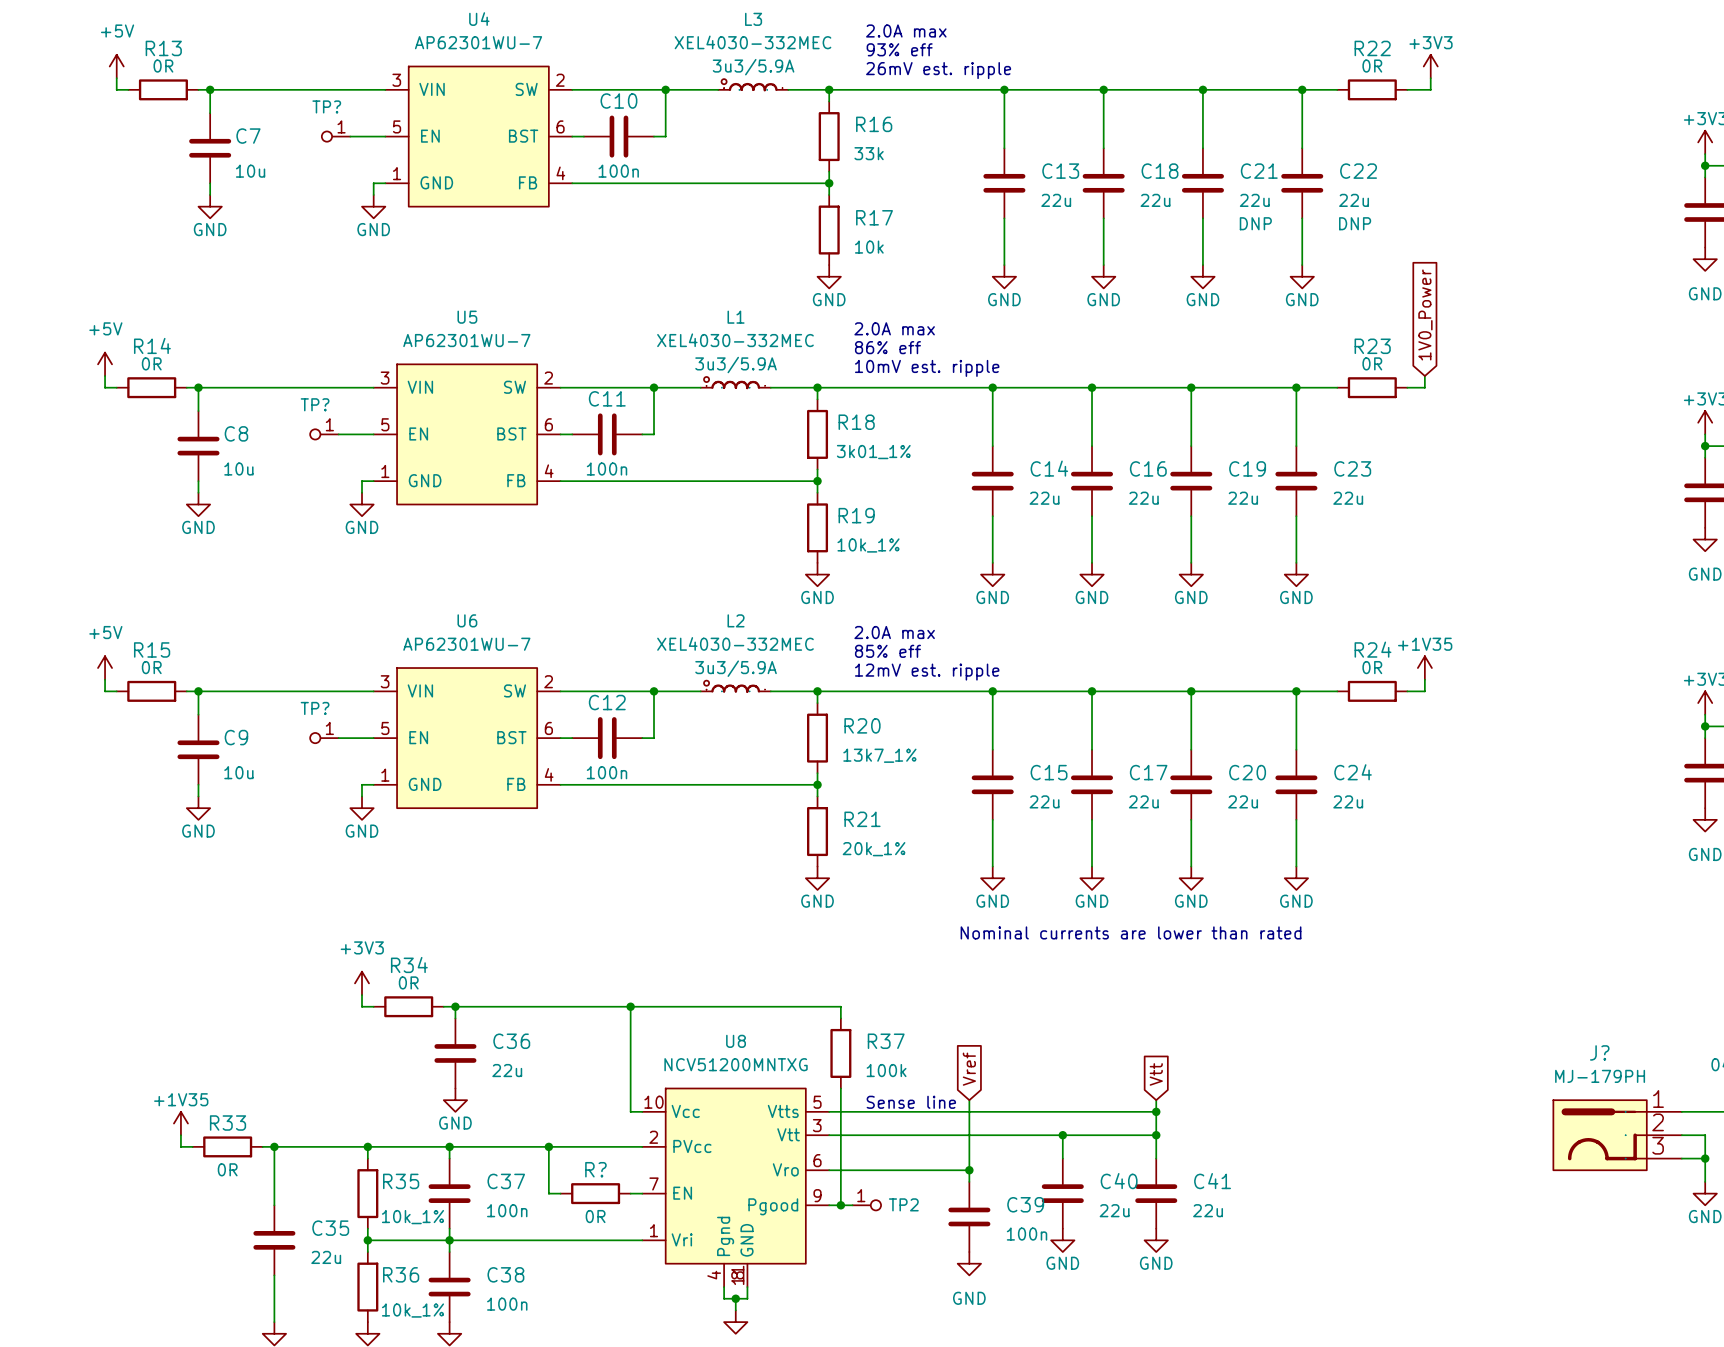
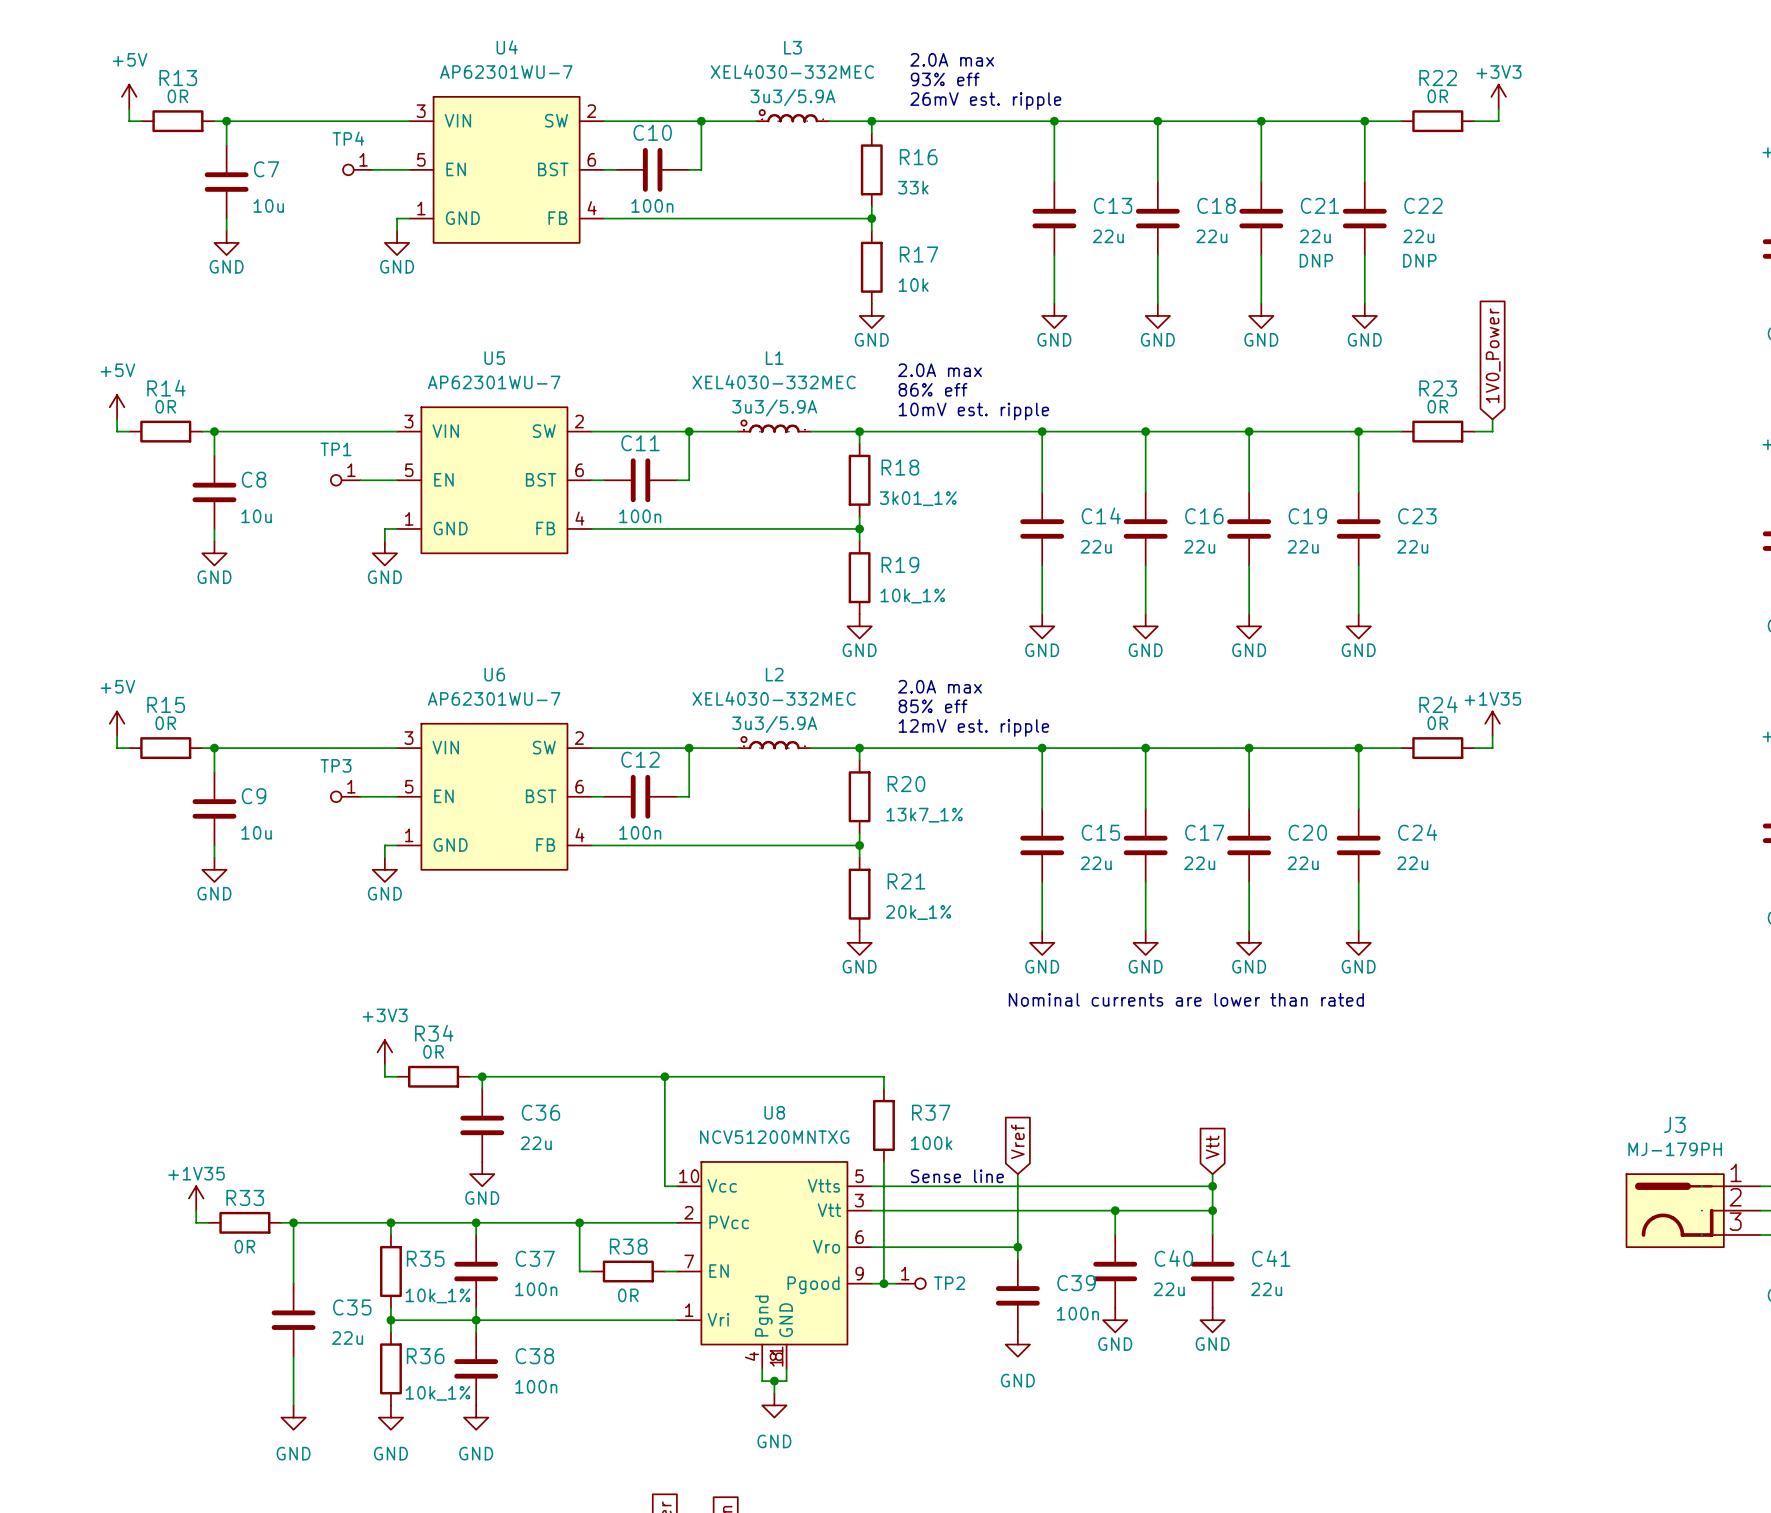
TP? name: TP? (326, 106) -> TP4 (348, 138)
TP? name: TP? (315, 404) -> TP1 (335, 449)
TP? name: TP? (315, 708) -> TP3 (335, 765)
J? name: J? (1599, 1052) -> J3 (1674, 1124)
R? name: R? (595, 1169) -> R38 (628, 1246)

